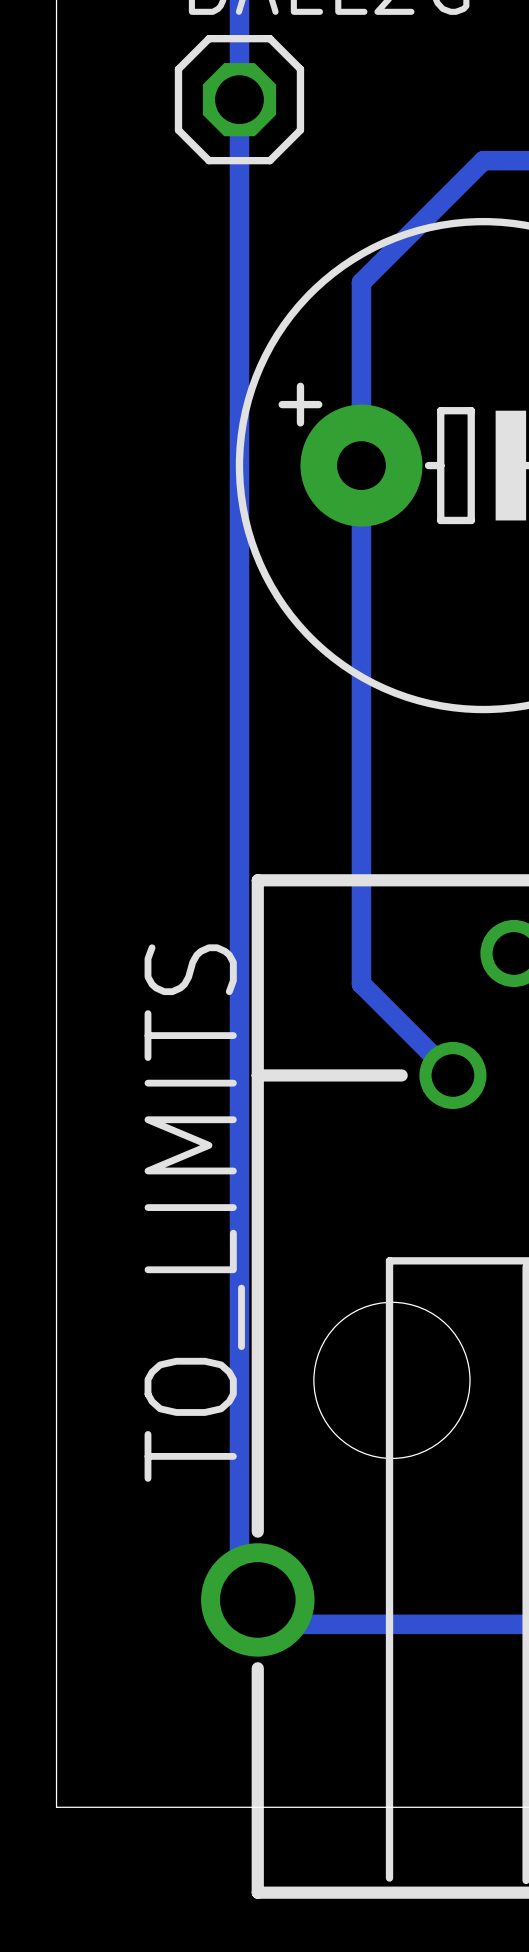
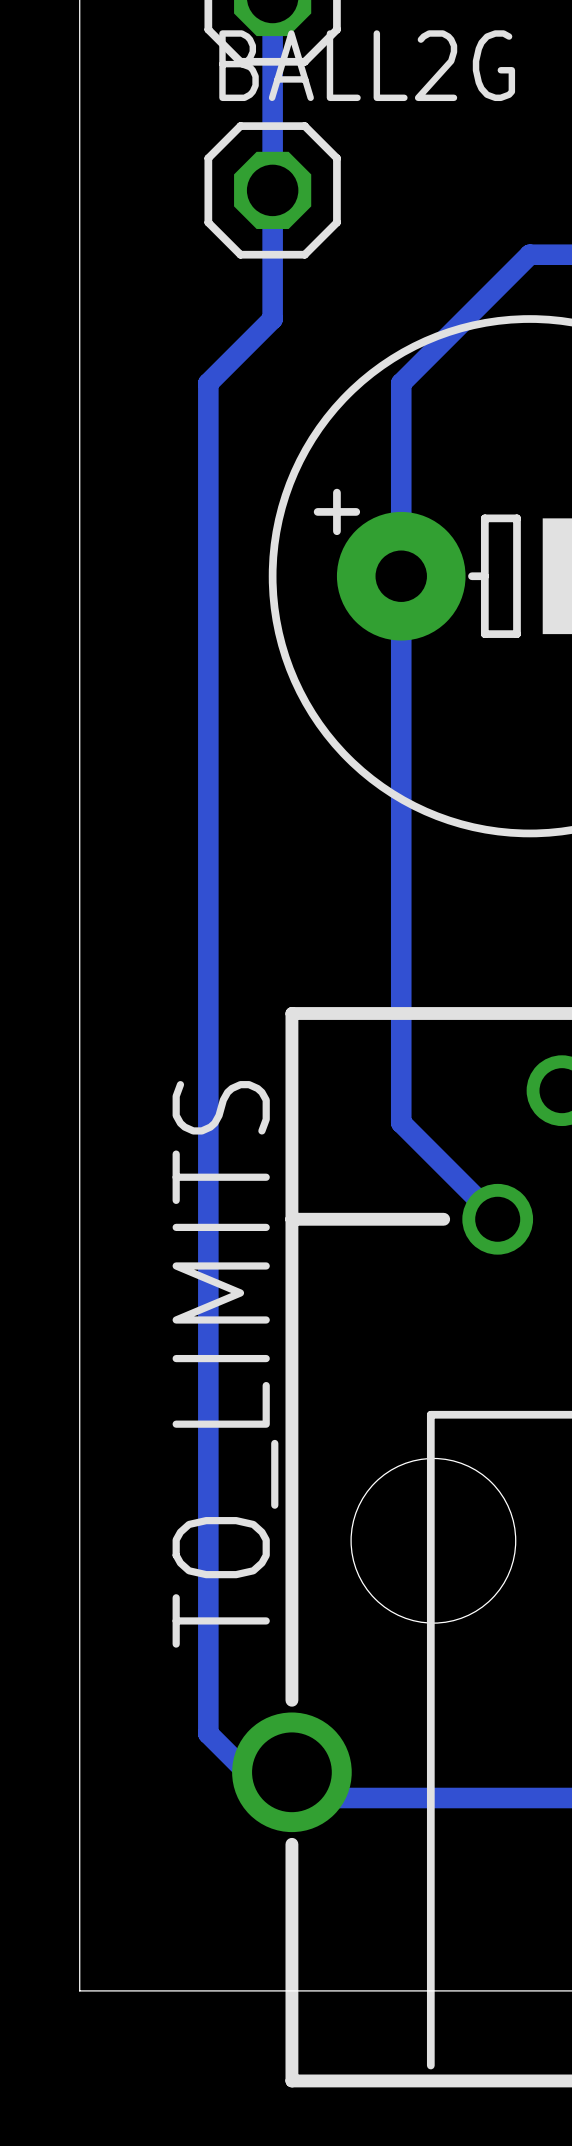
bottom track: (239, 221) (239, 1624) -> (272, 319) (208, 383) (208, 1733) (272, 1798)

